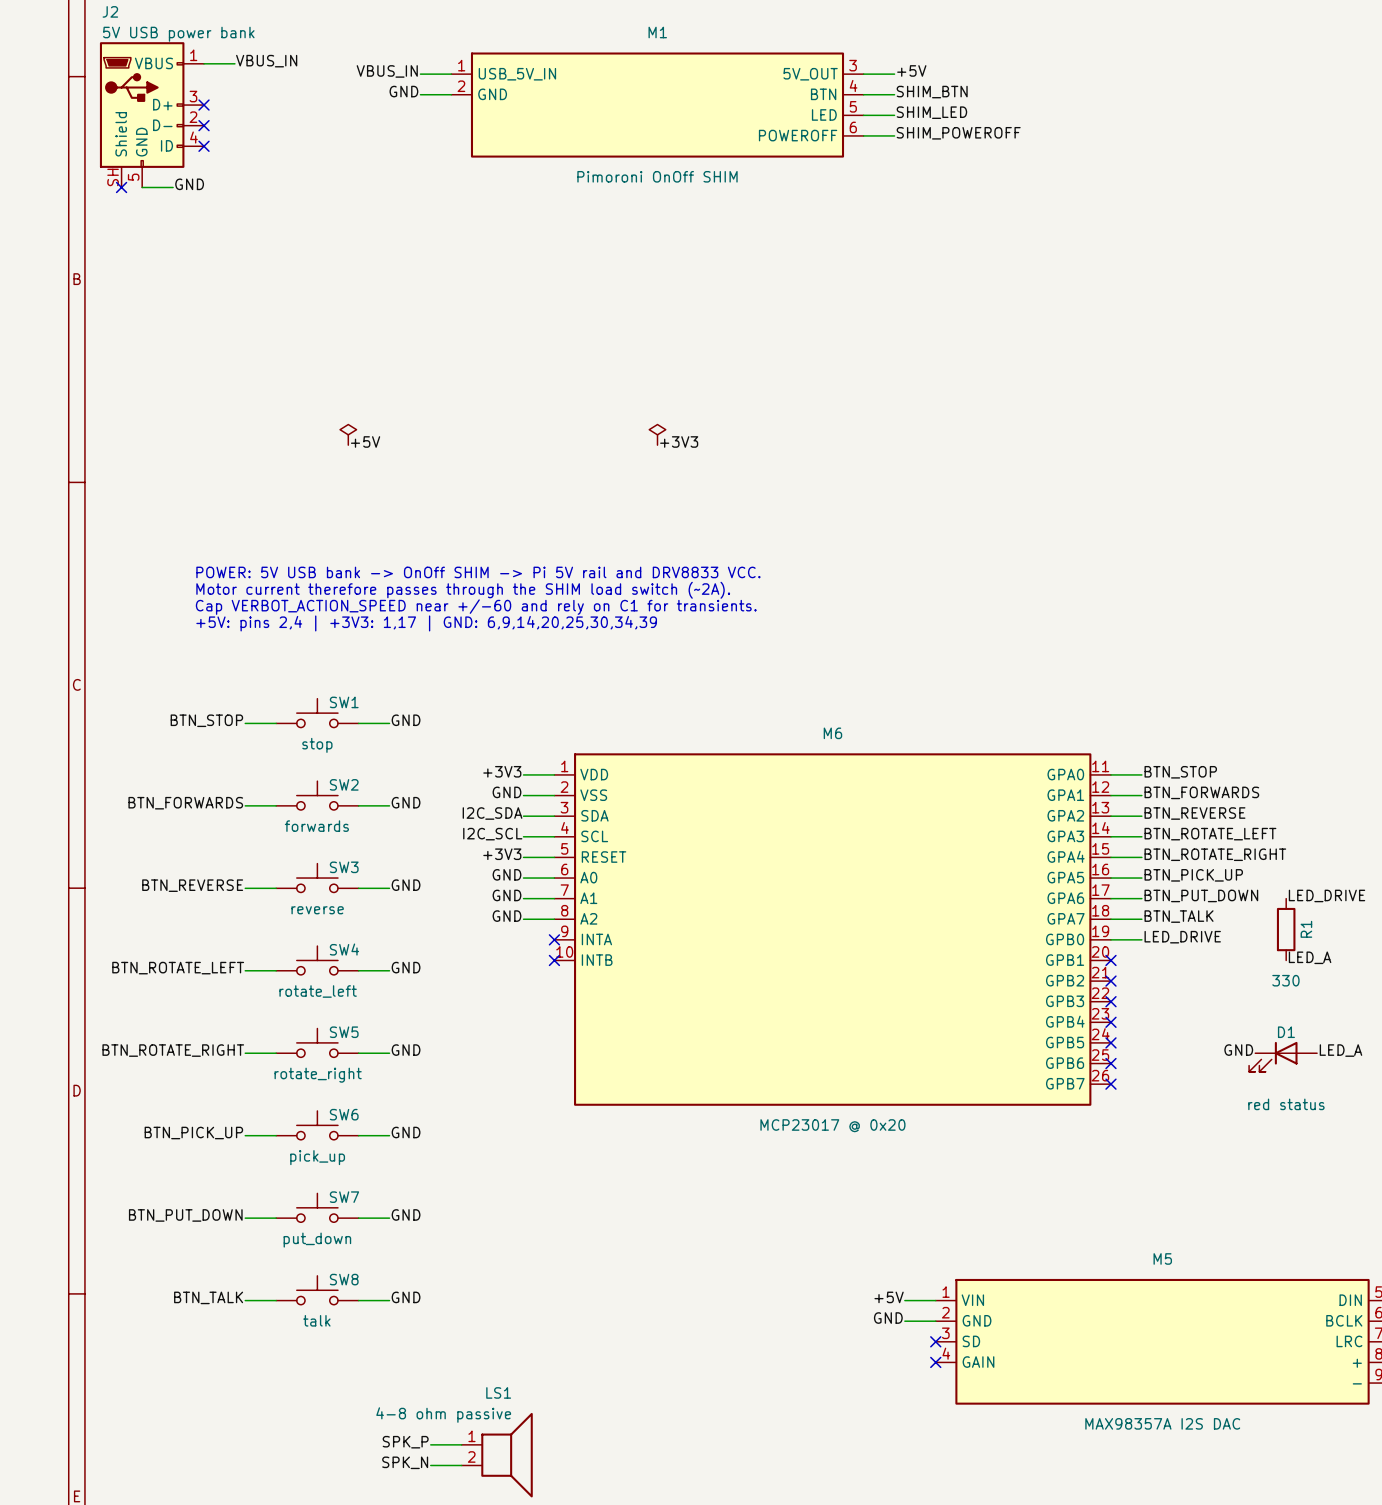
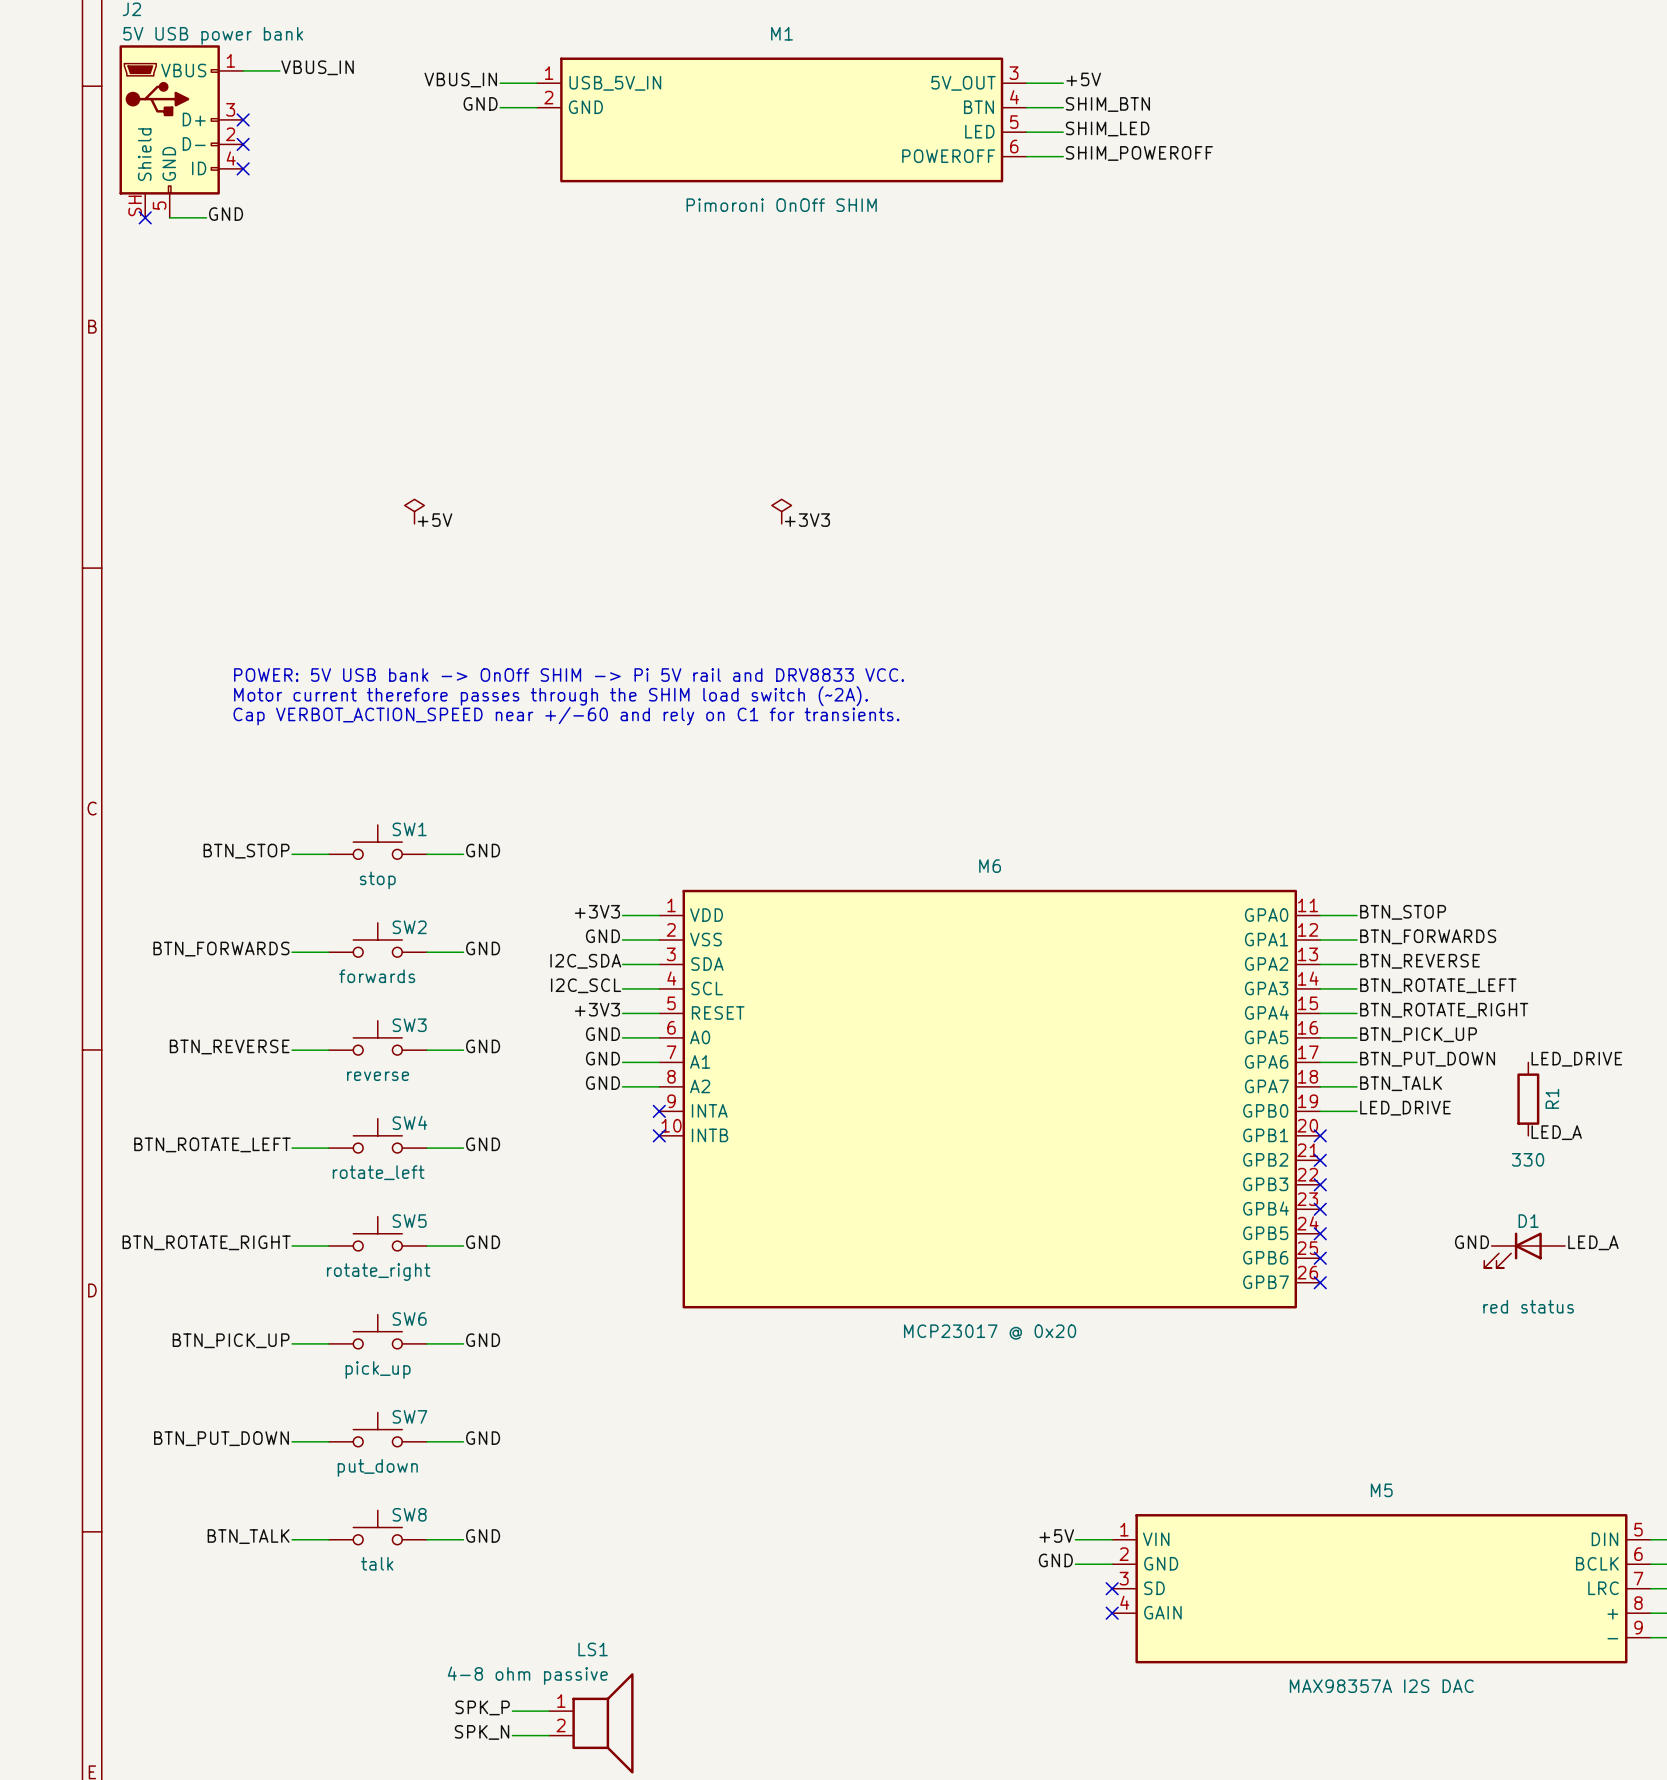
text: +5V: pins 2,4 | +3V3: 1,17 | GND: 6,9,14,20,25,30,34,39 (426, 623) -> none

